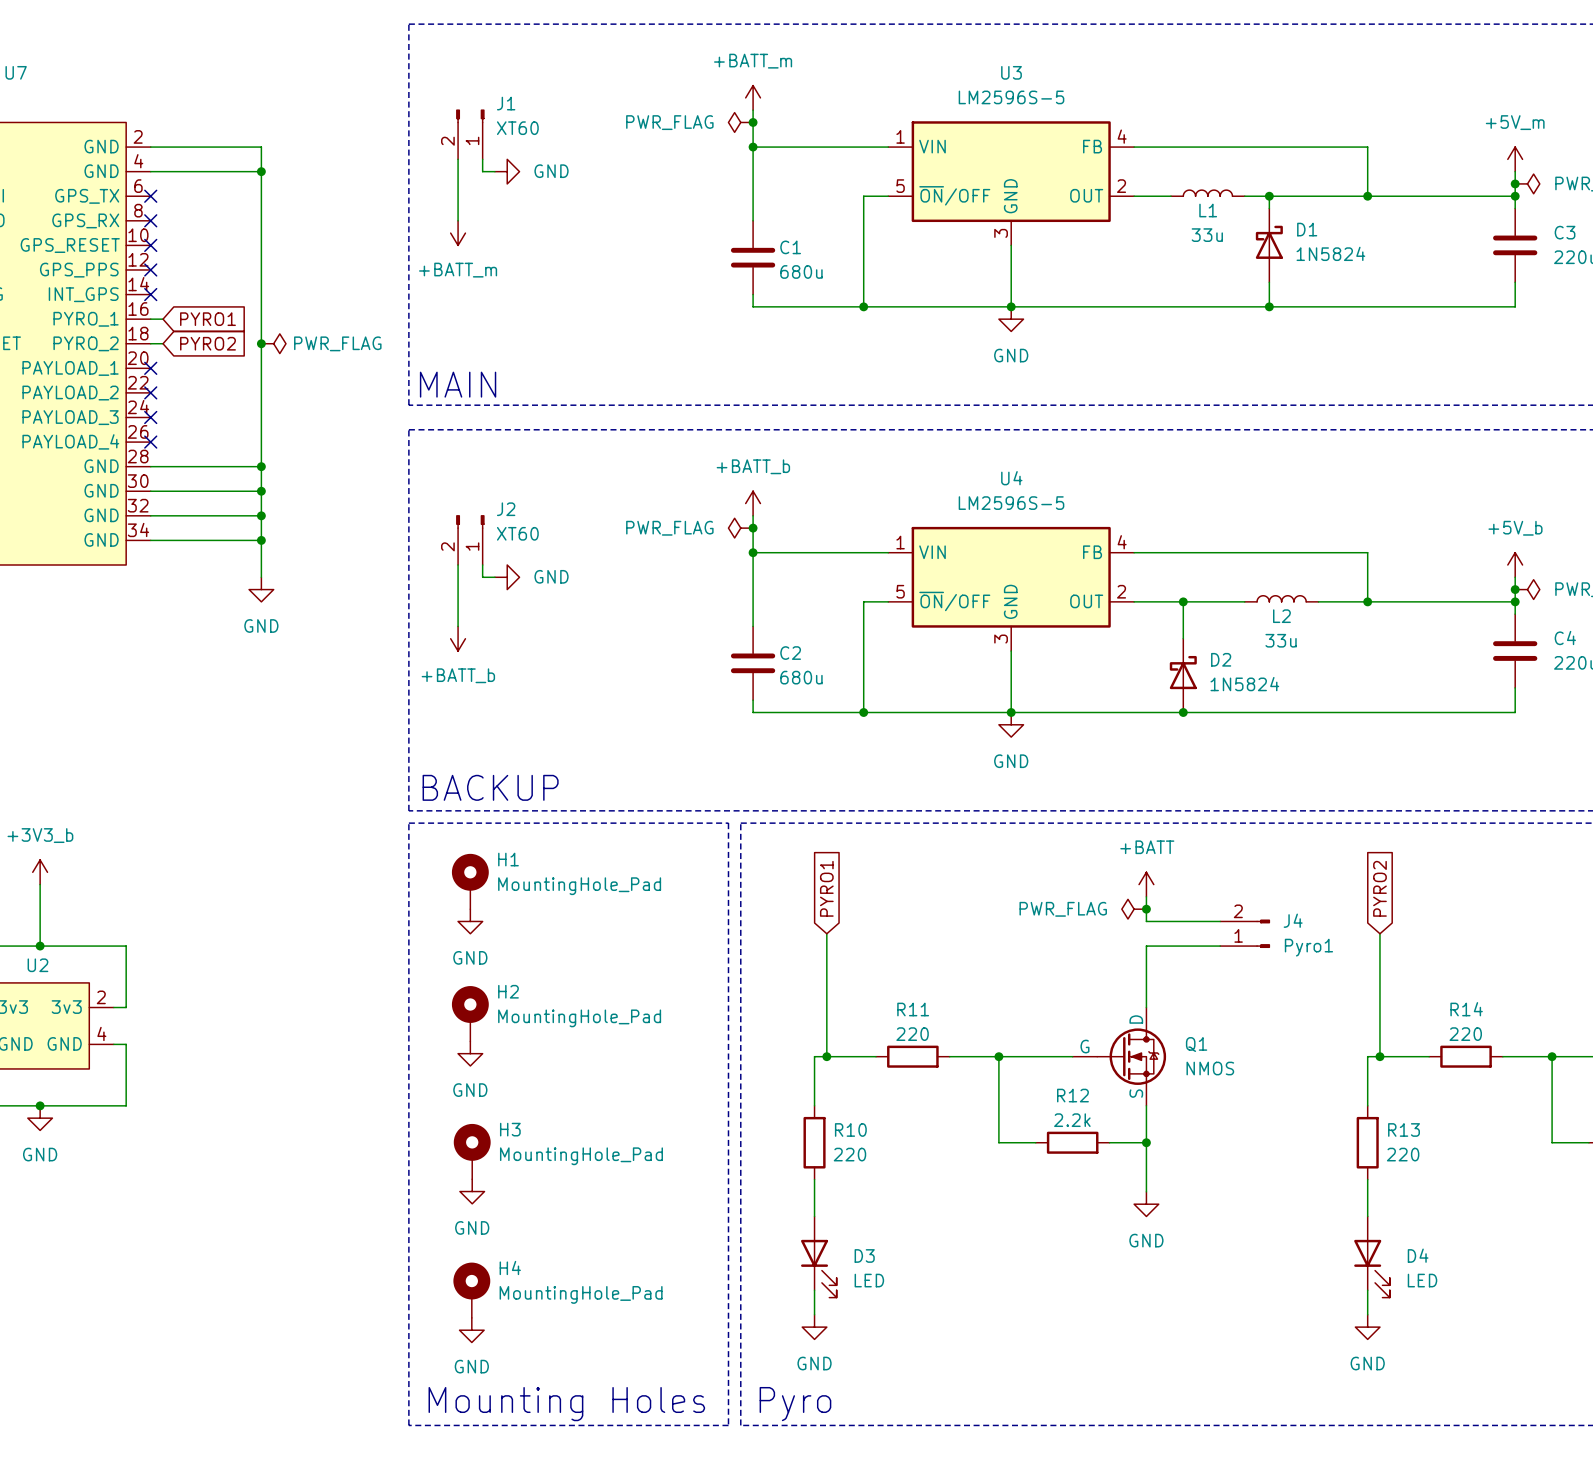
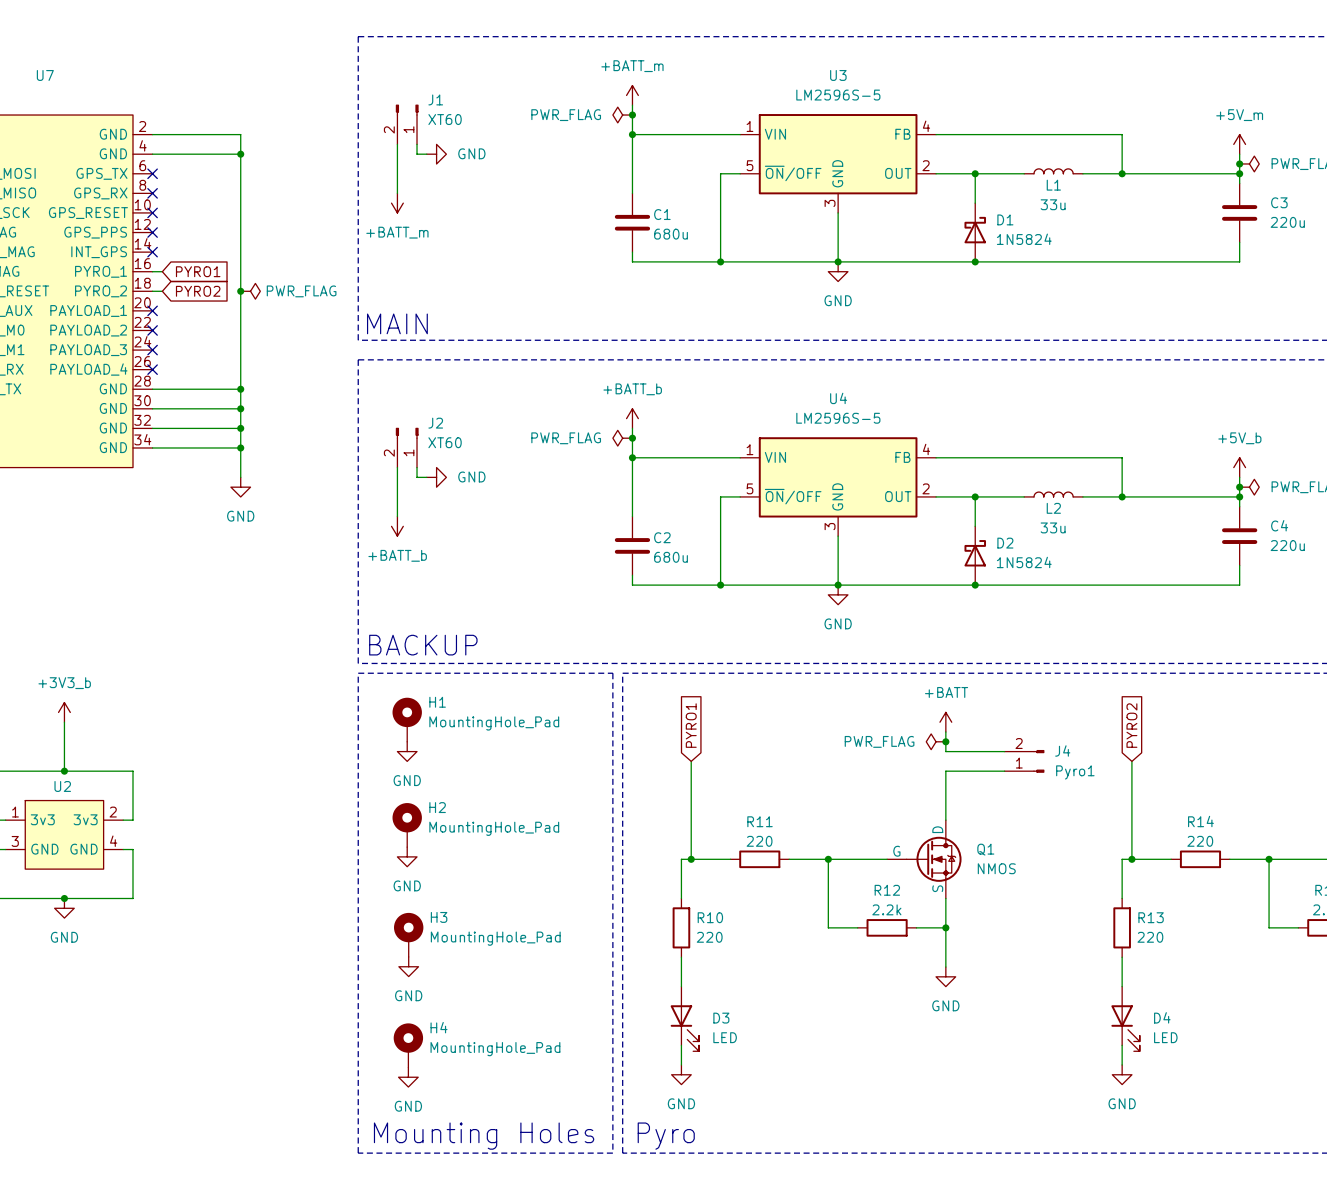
L1 position: (1207, 193) -> (1053, 171)
wire: none -> (975, 173) (975, 203)
junction: none -> (975, 173)
wire: (1244, 196) (1318, 196) -> (1024, 173) (965, 173)
wire: (1269, 196) (1269, 208) -> none
junction: (1269, 196) -> none
D1 position: (1269, 245) -> (975, 232)
wire: (1269, 282) (1269, 306) -> none
junction: none -> (975, 261)
junction: (1269, 306) -> none

